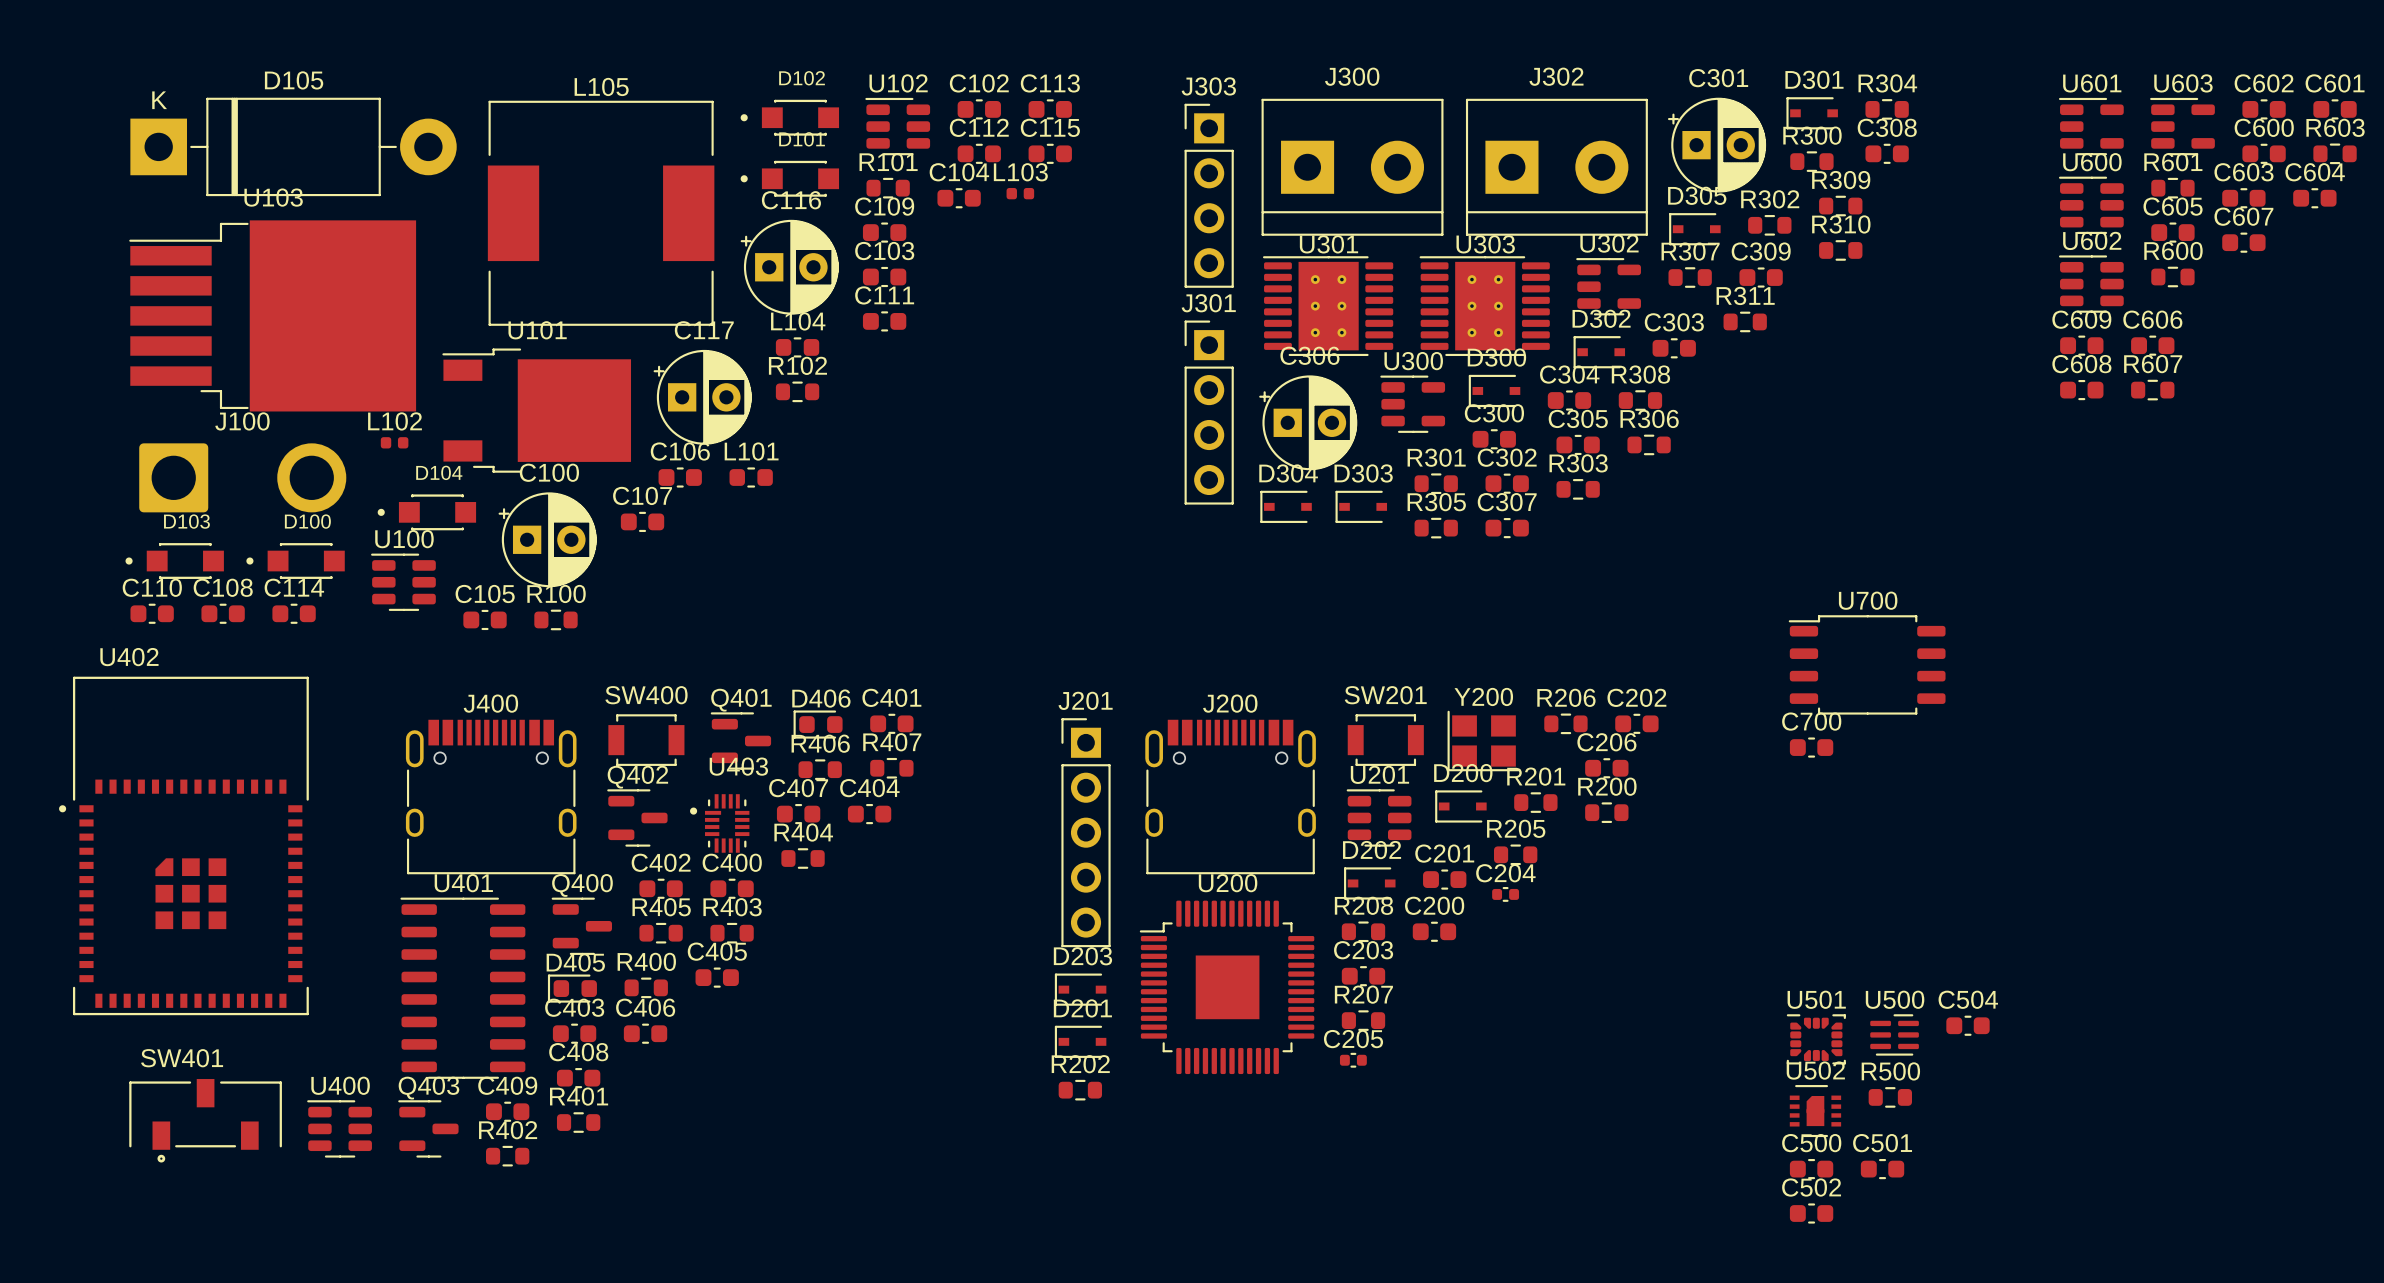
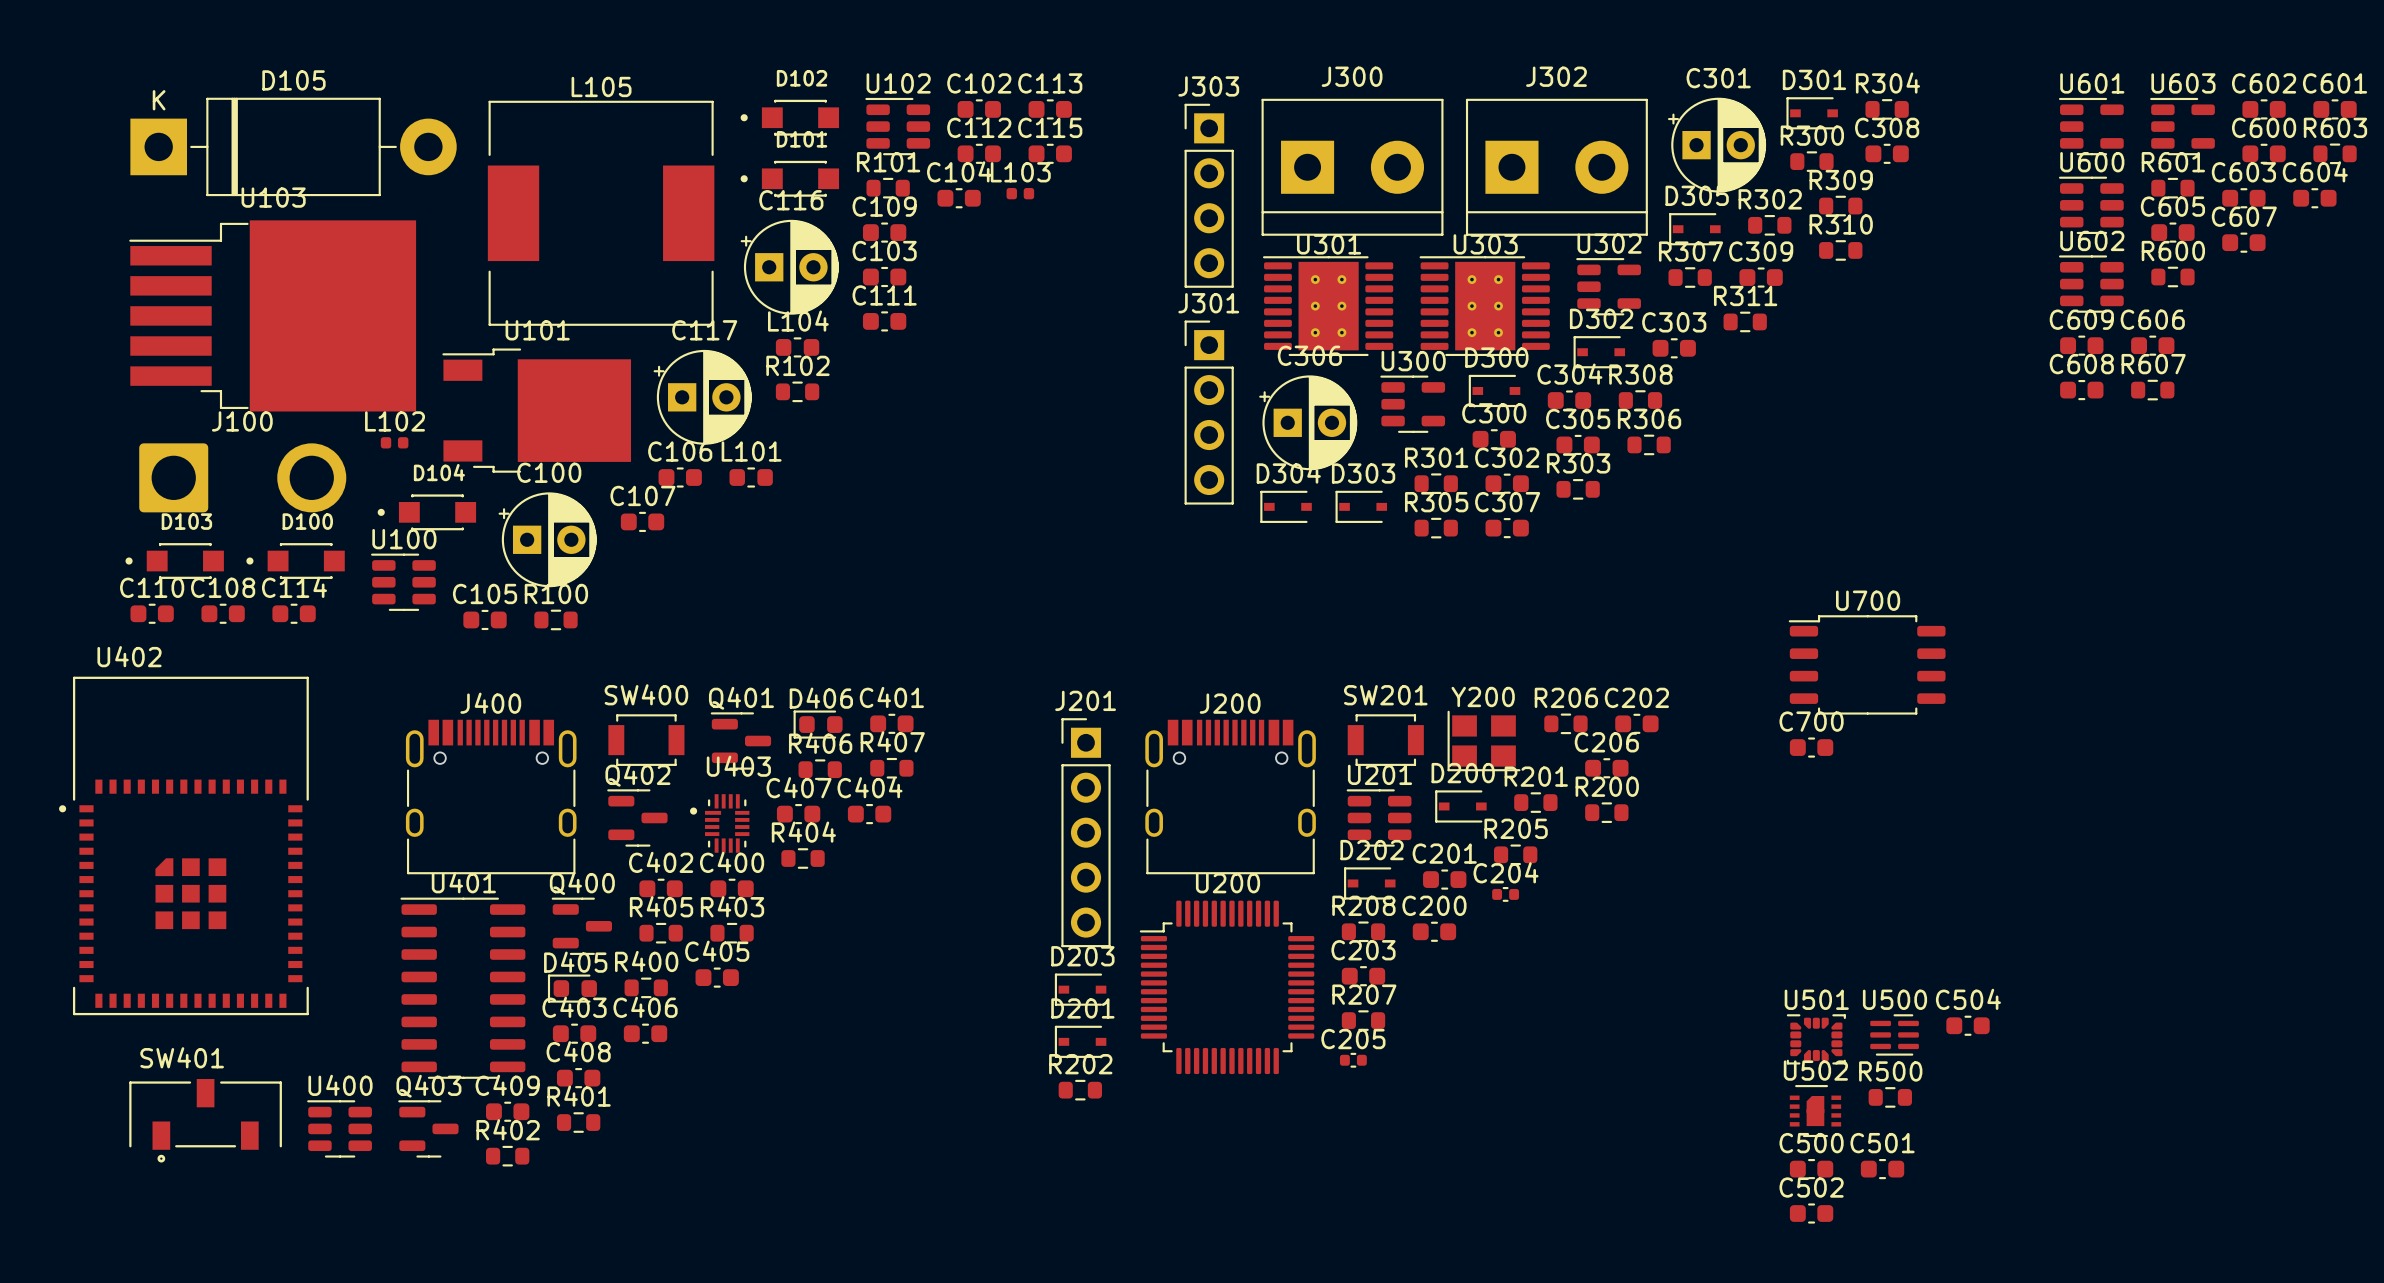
U200 footprint: [1139, 900, 1315, 1075] -> [1139, 900, 1315, 1075]

